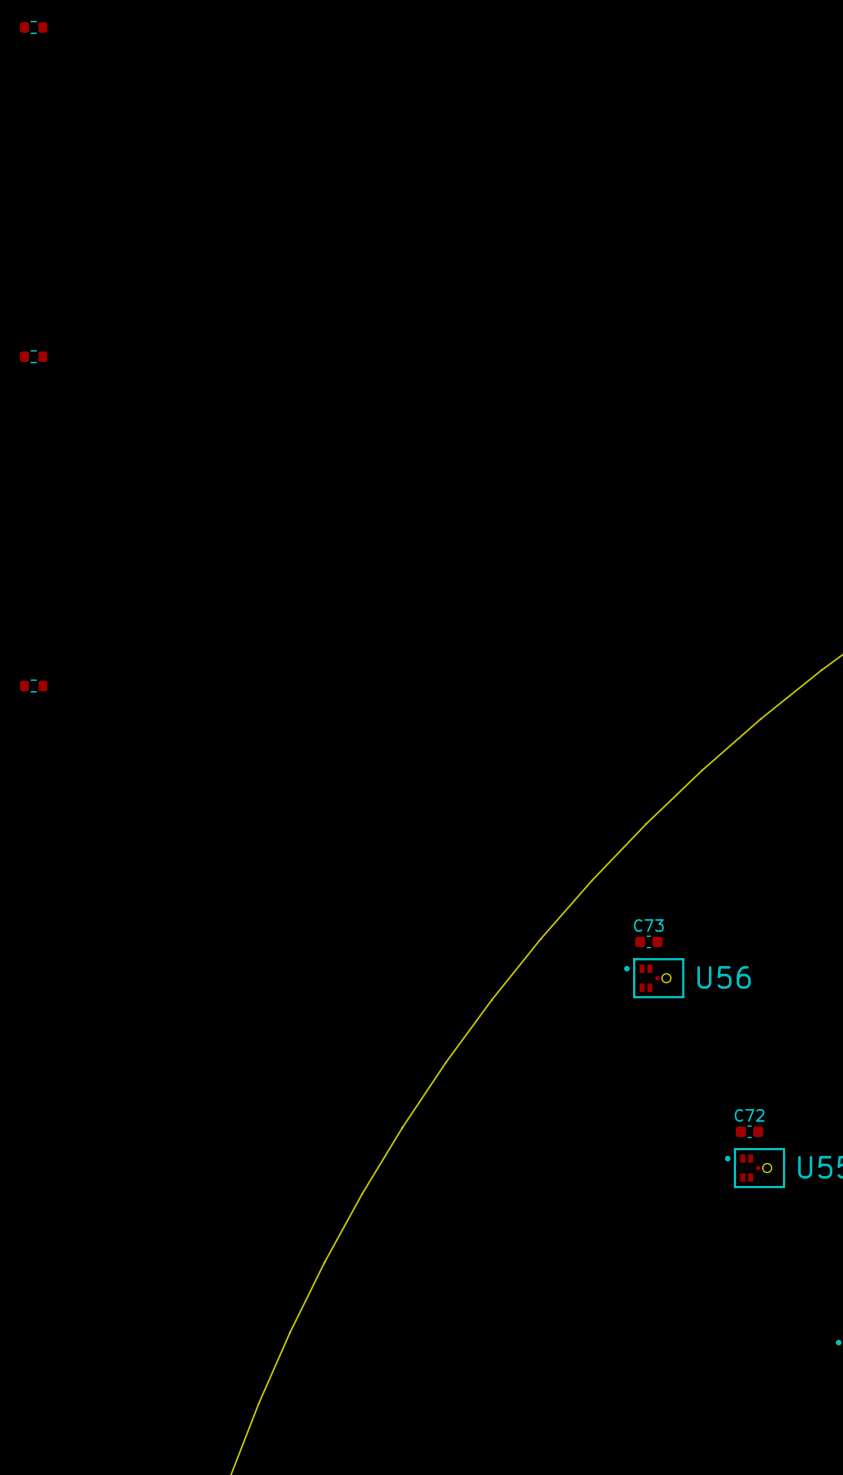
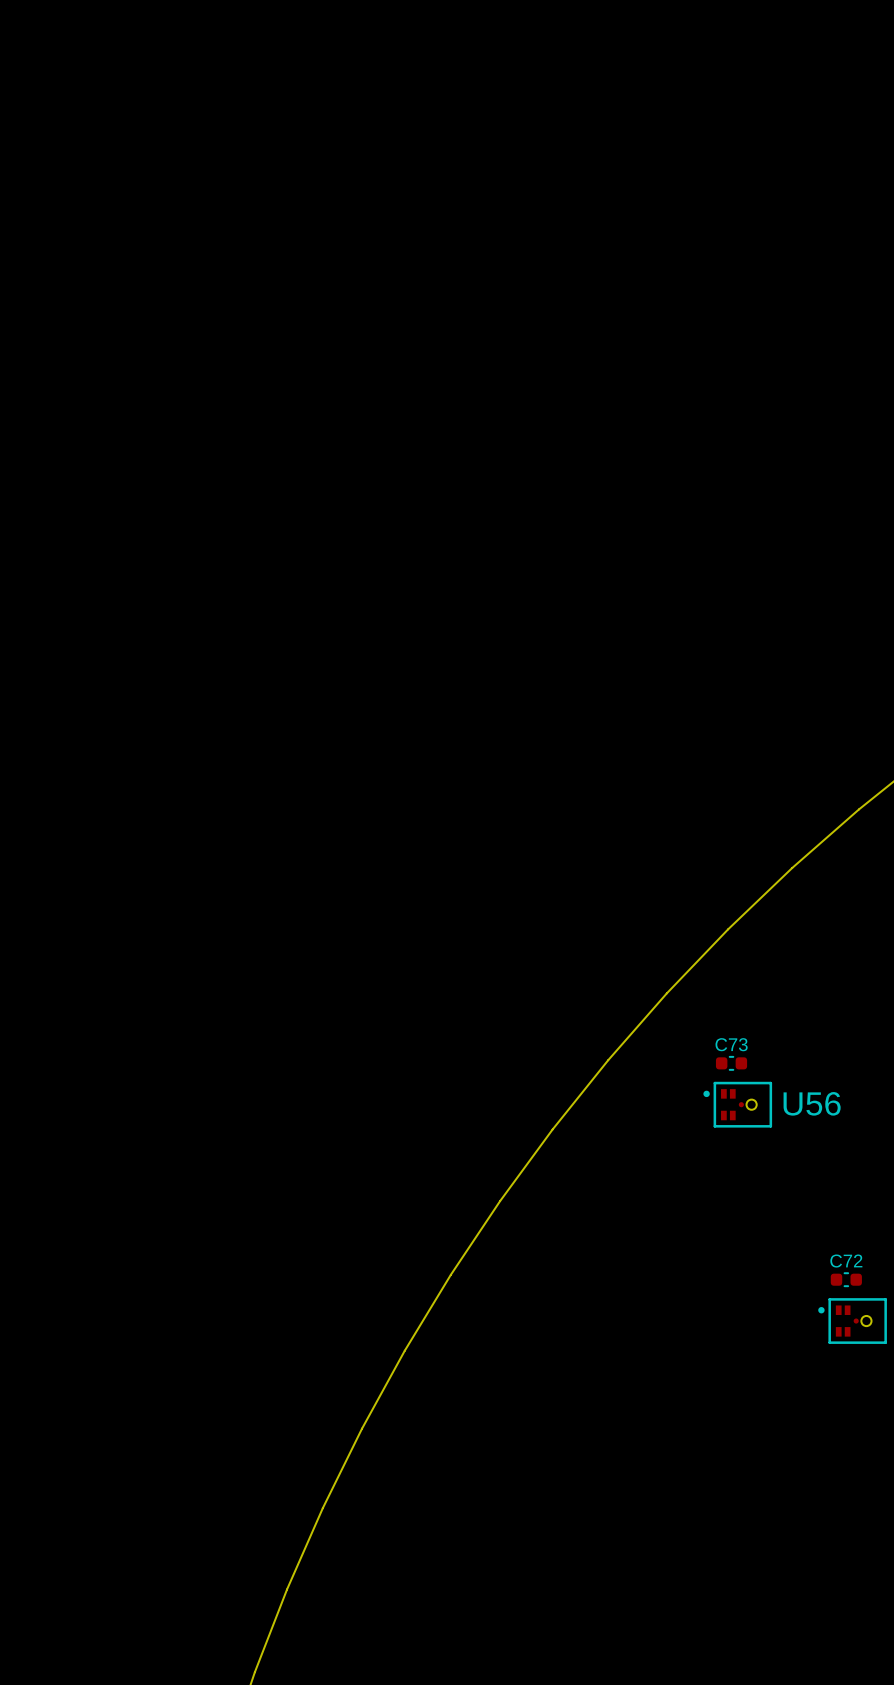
part: (33, 27) -> none
part: (33, 356) -> none
part: (33, 685) -> none

